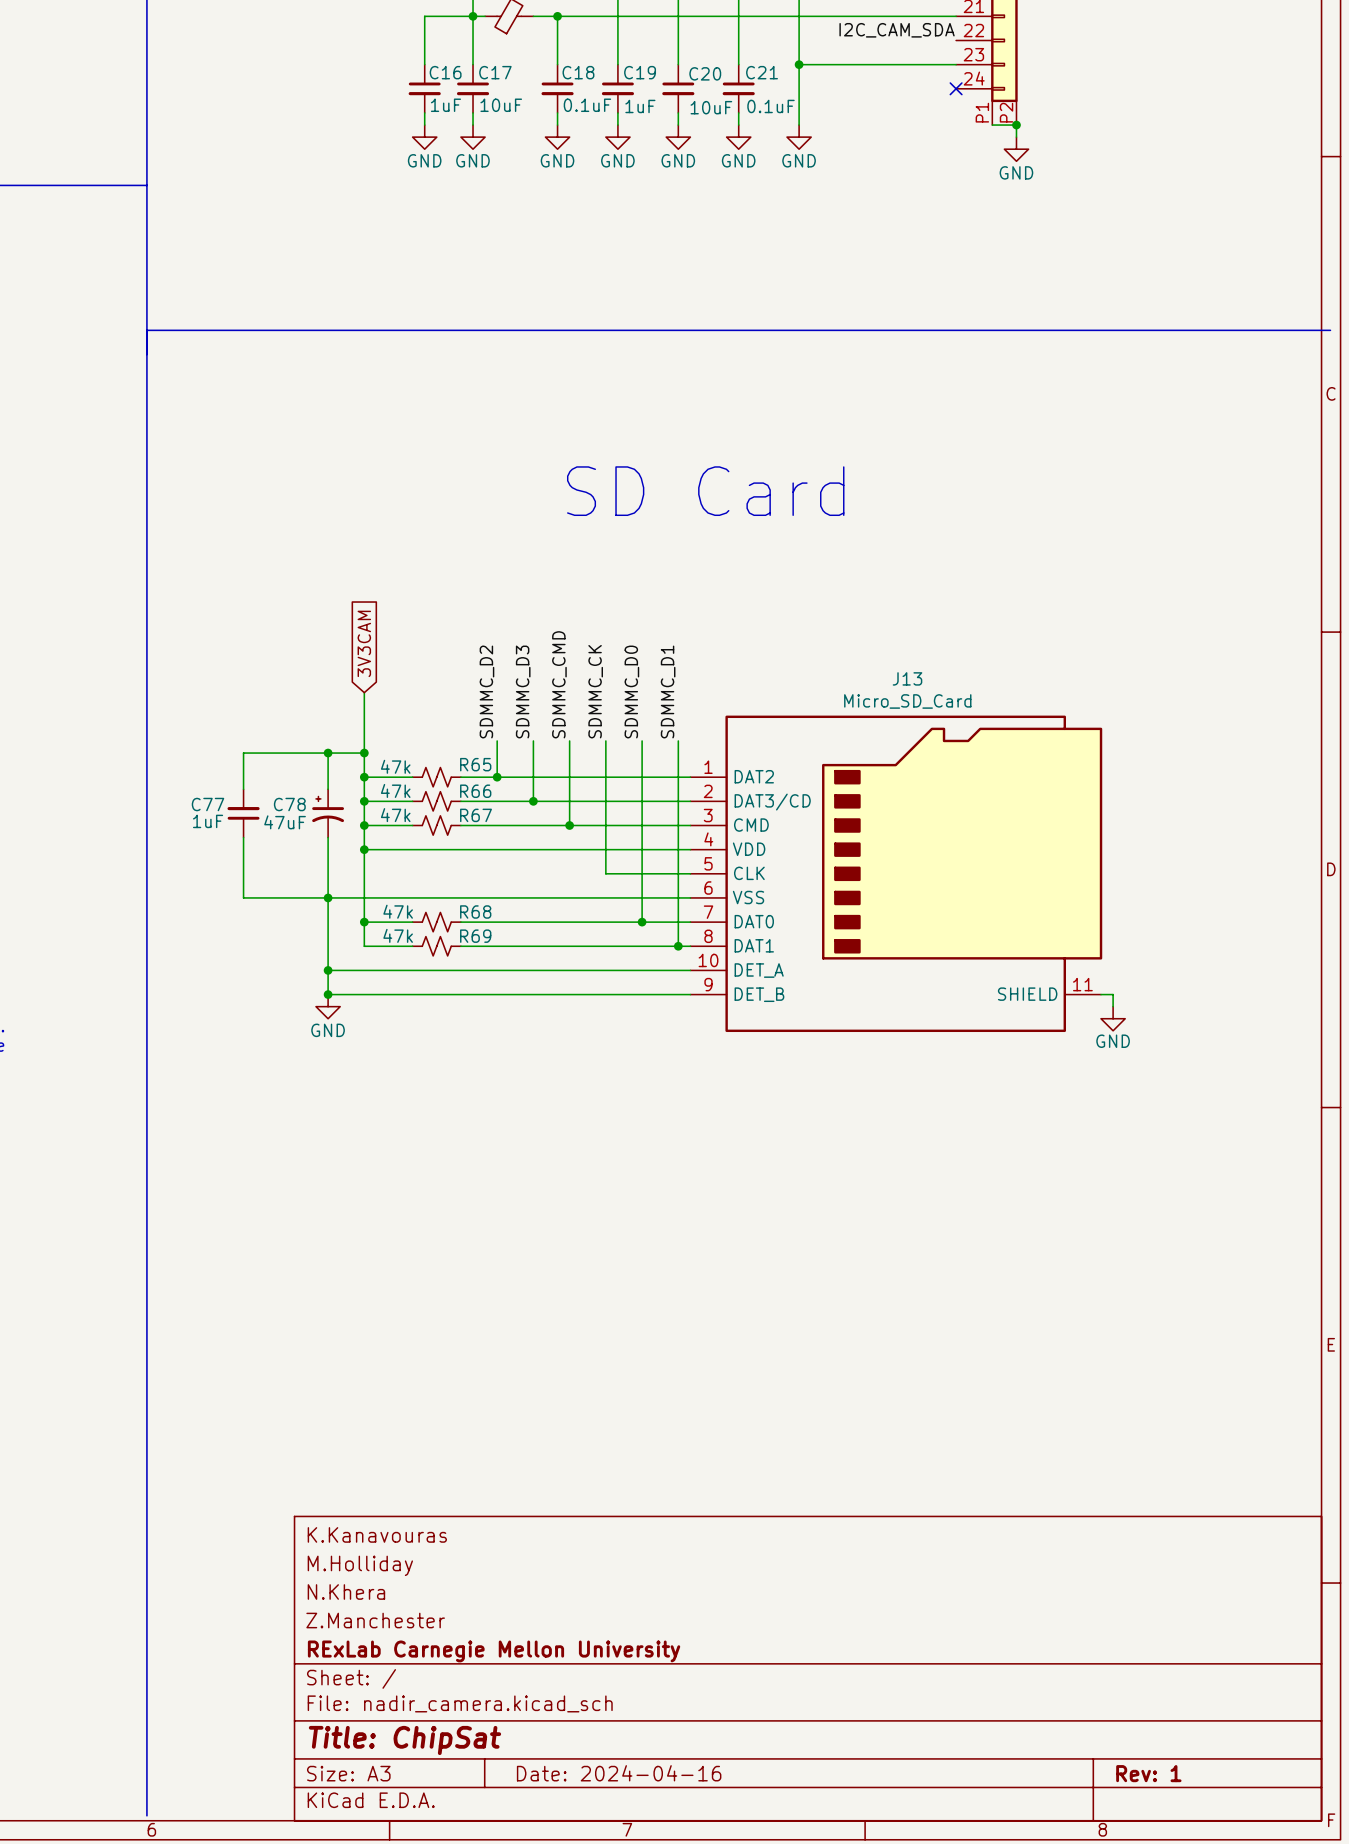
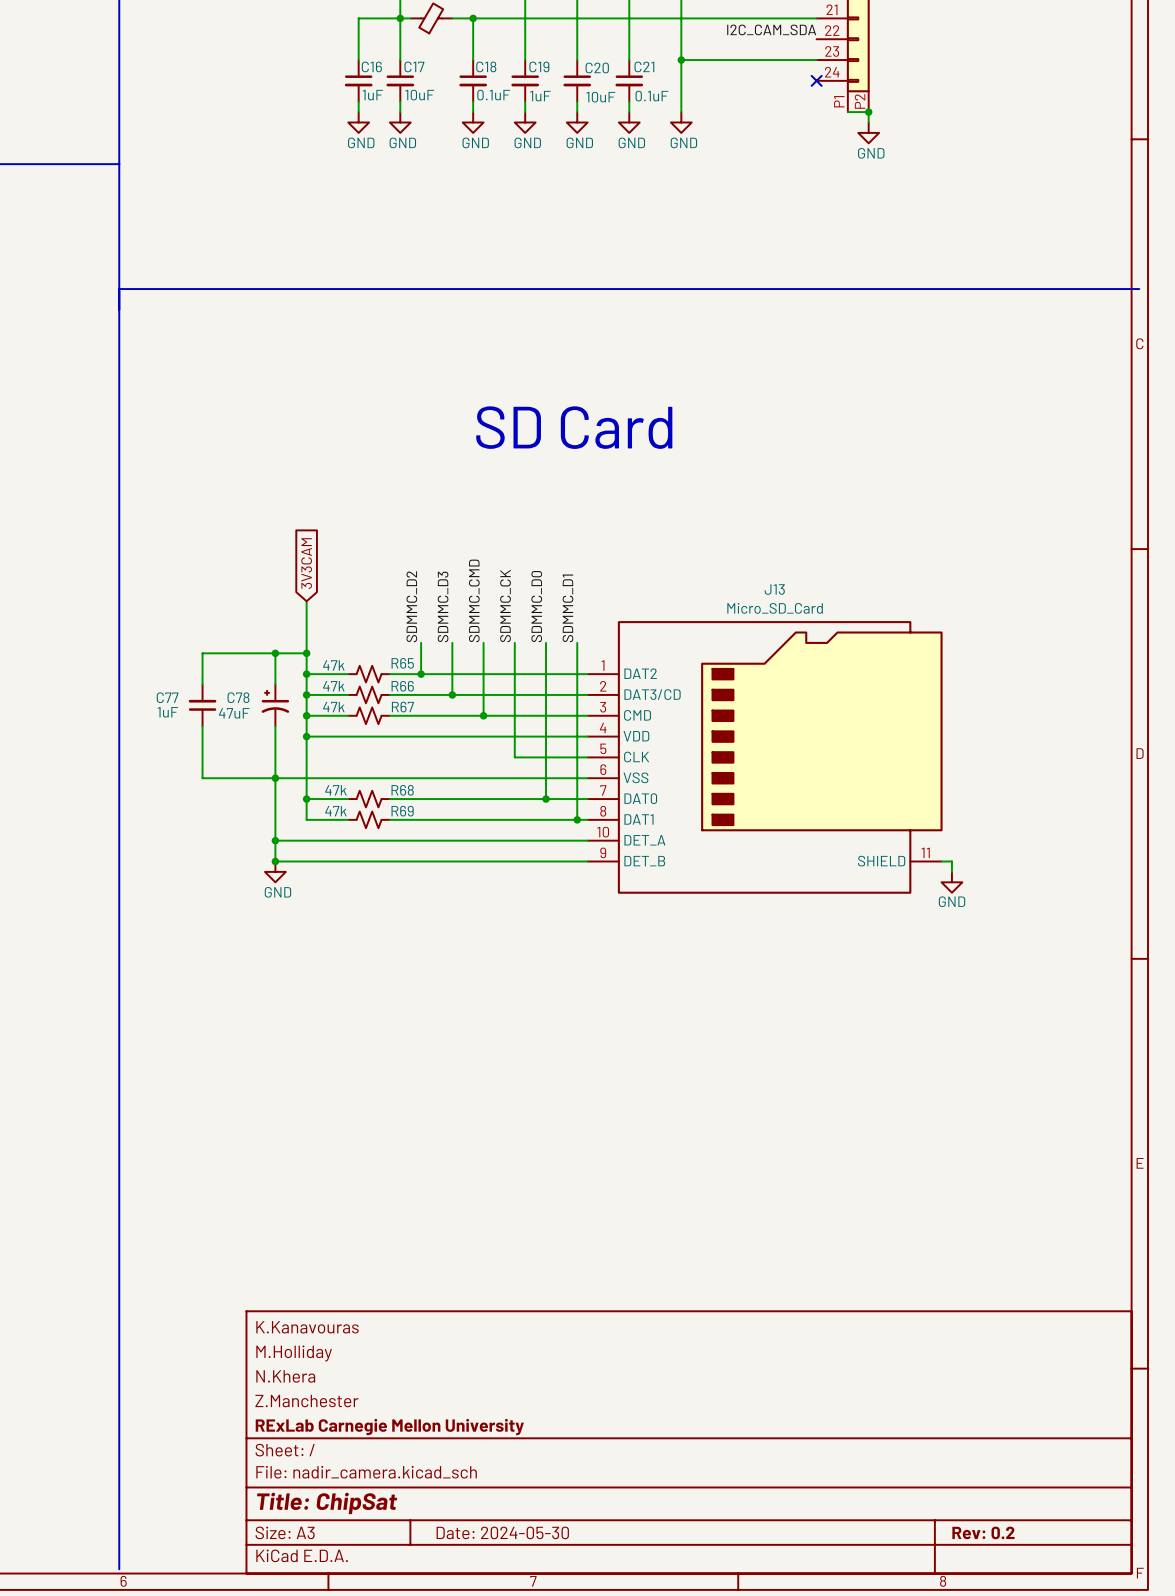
title block: Date: 2024-04-16 (619, 1773) -> Date: 2024-05-30 (502, 1532)
title block: Rev: 1 (1148, 1773) -> Rev: 0.2 (983, 1532)

